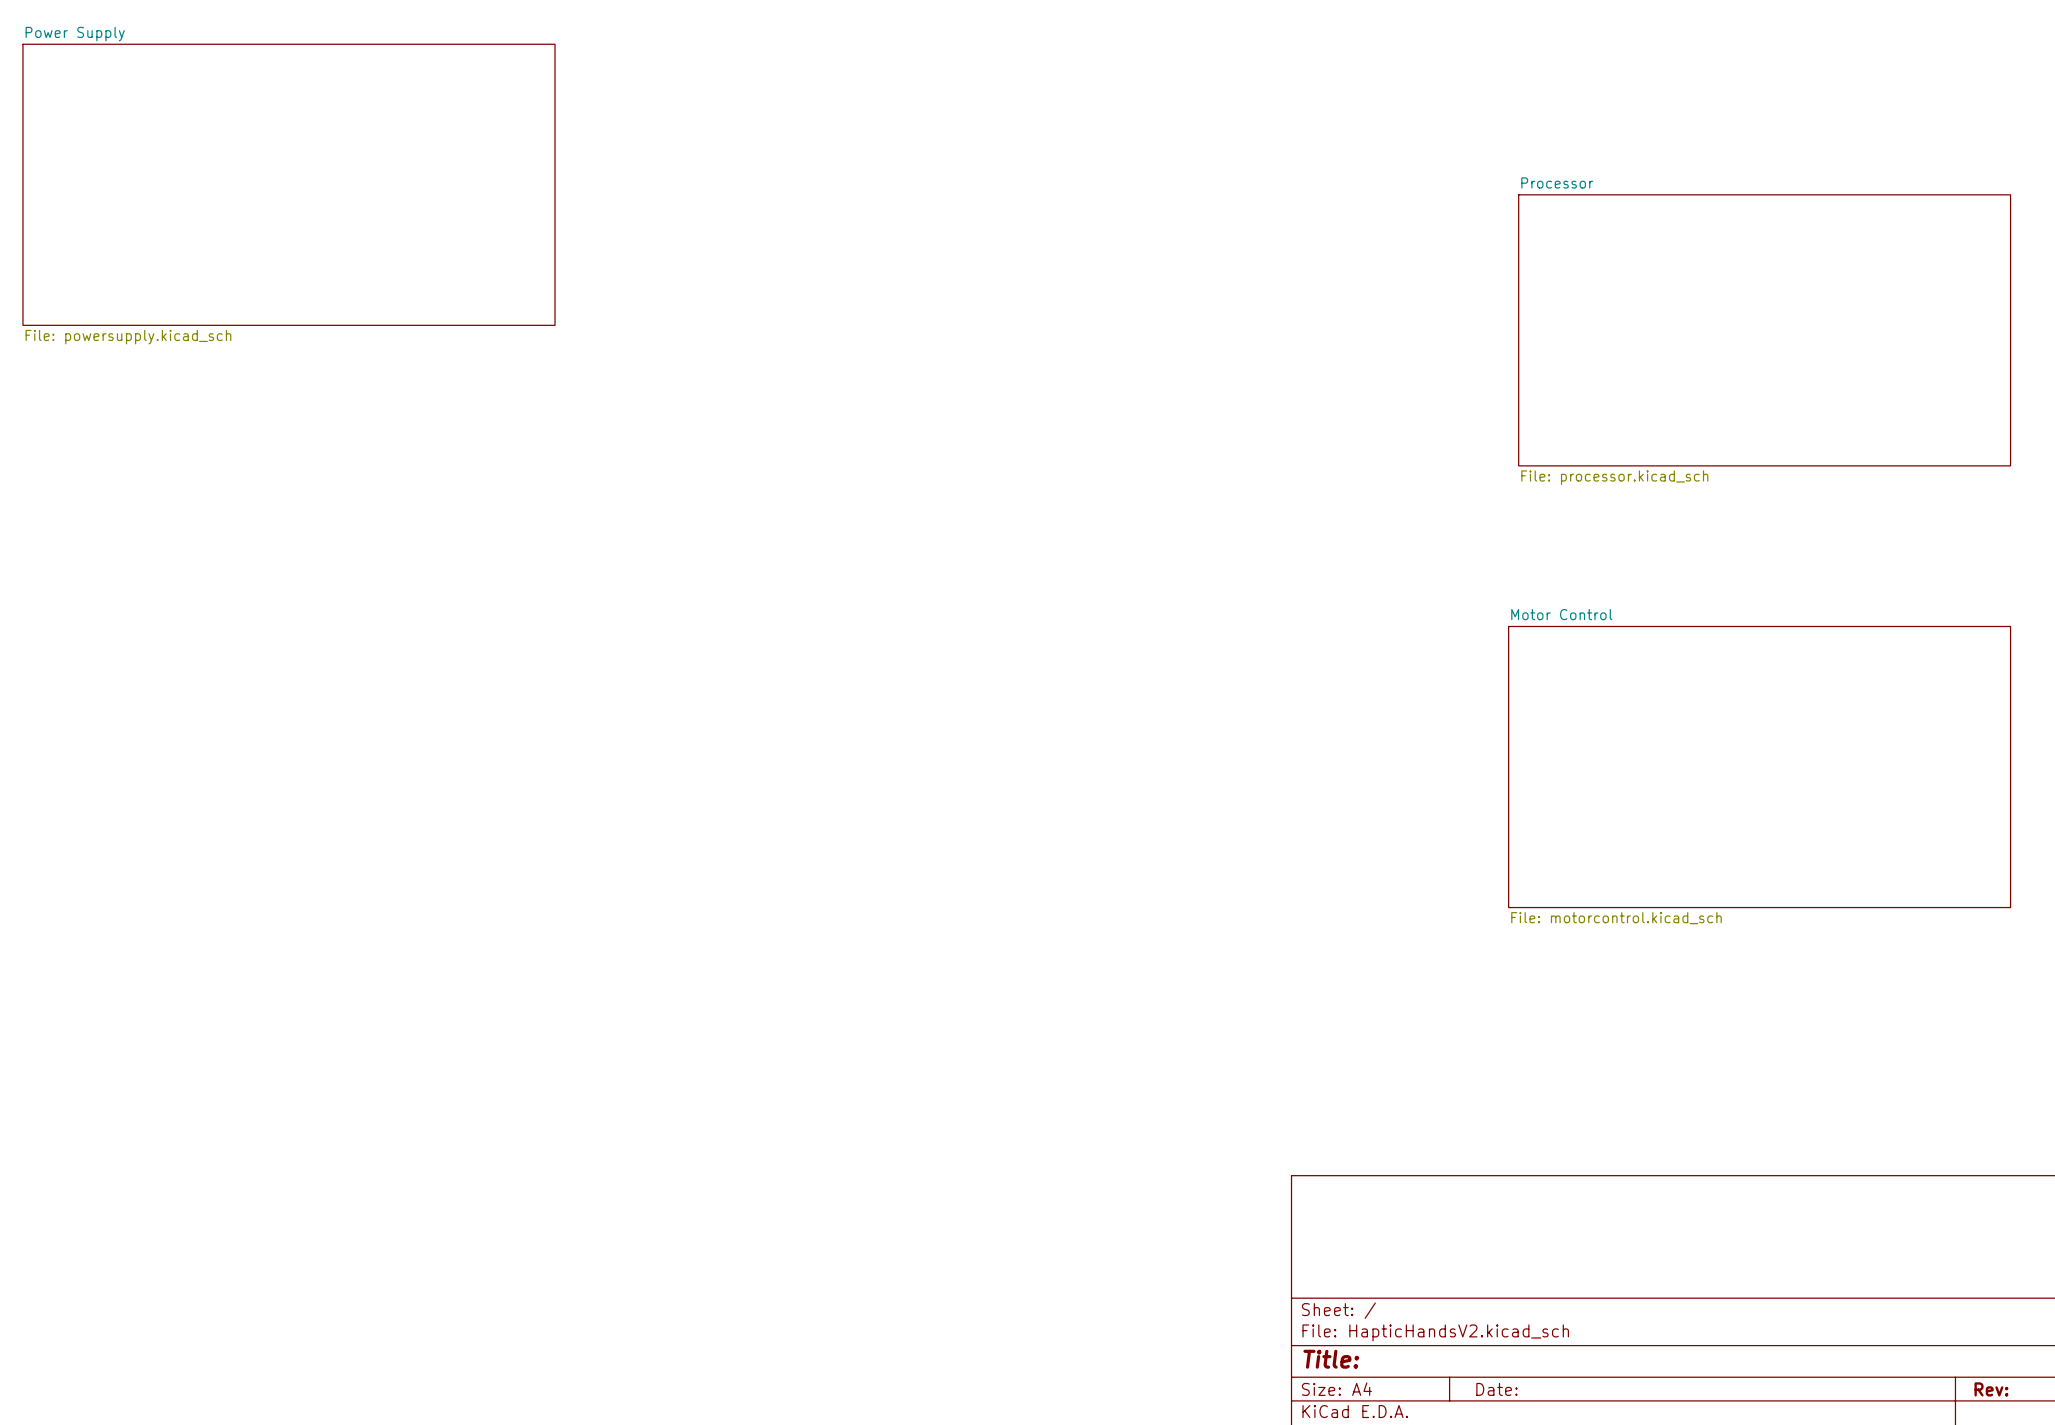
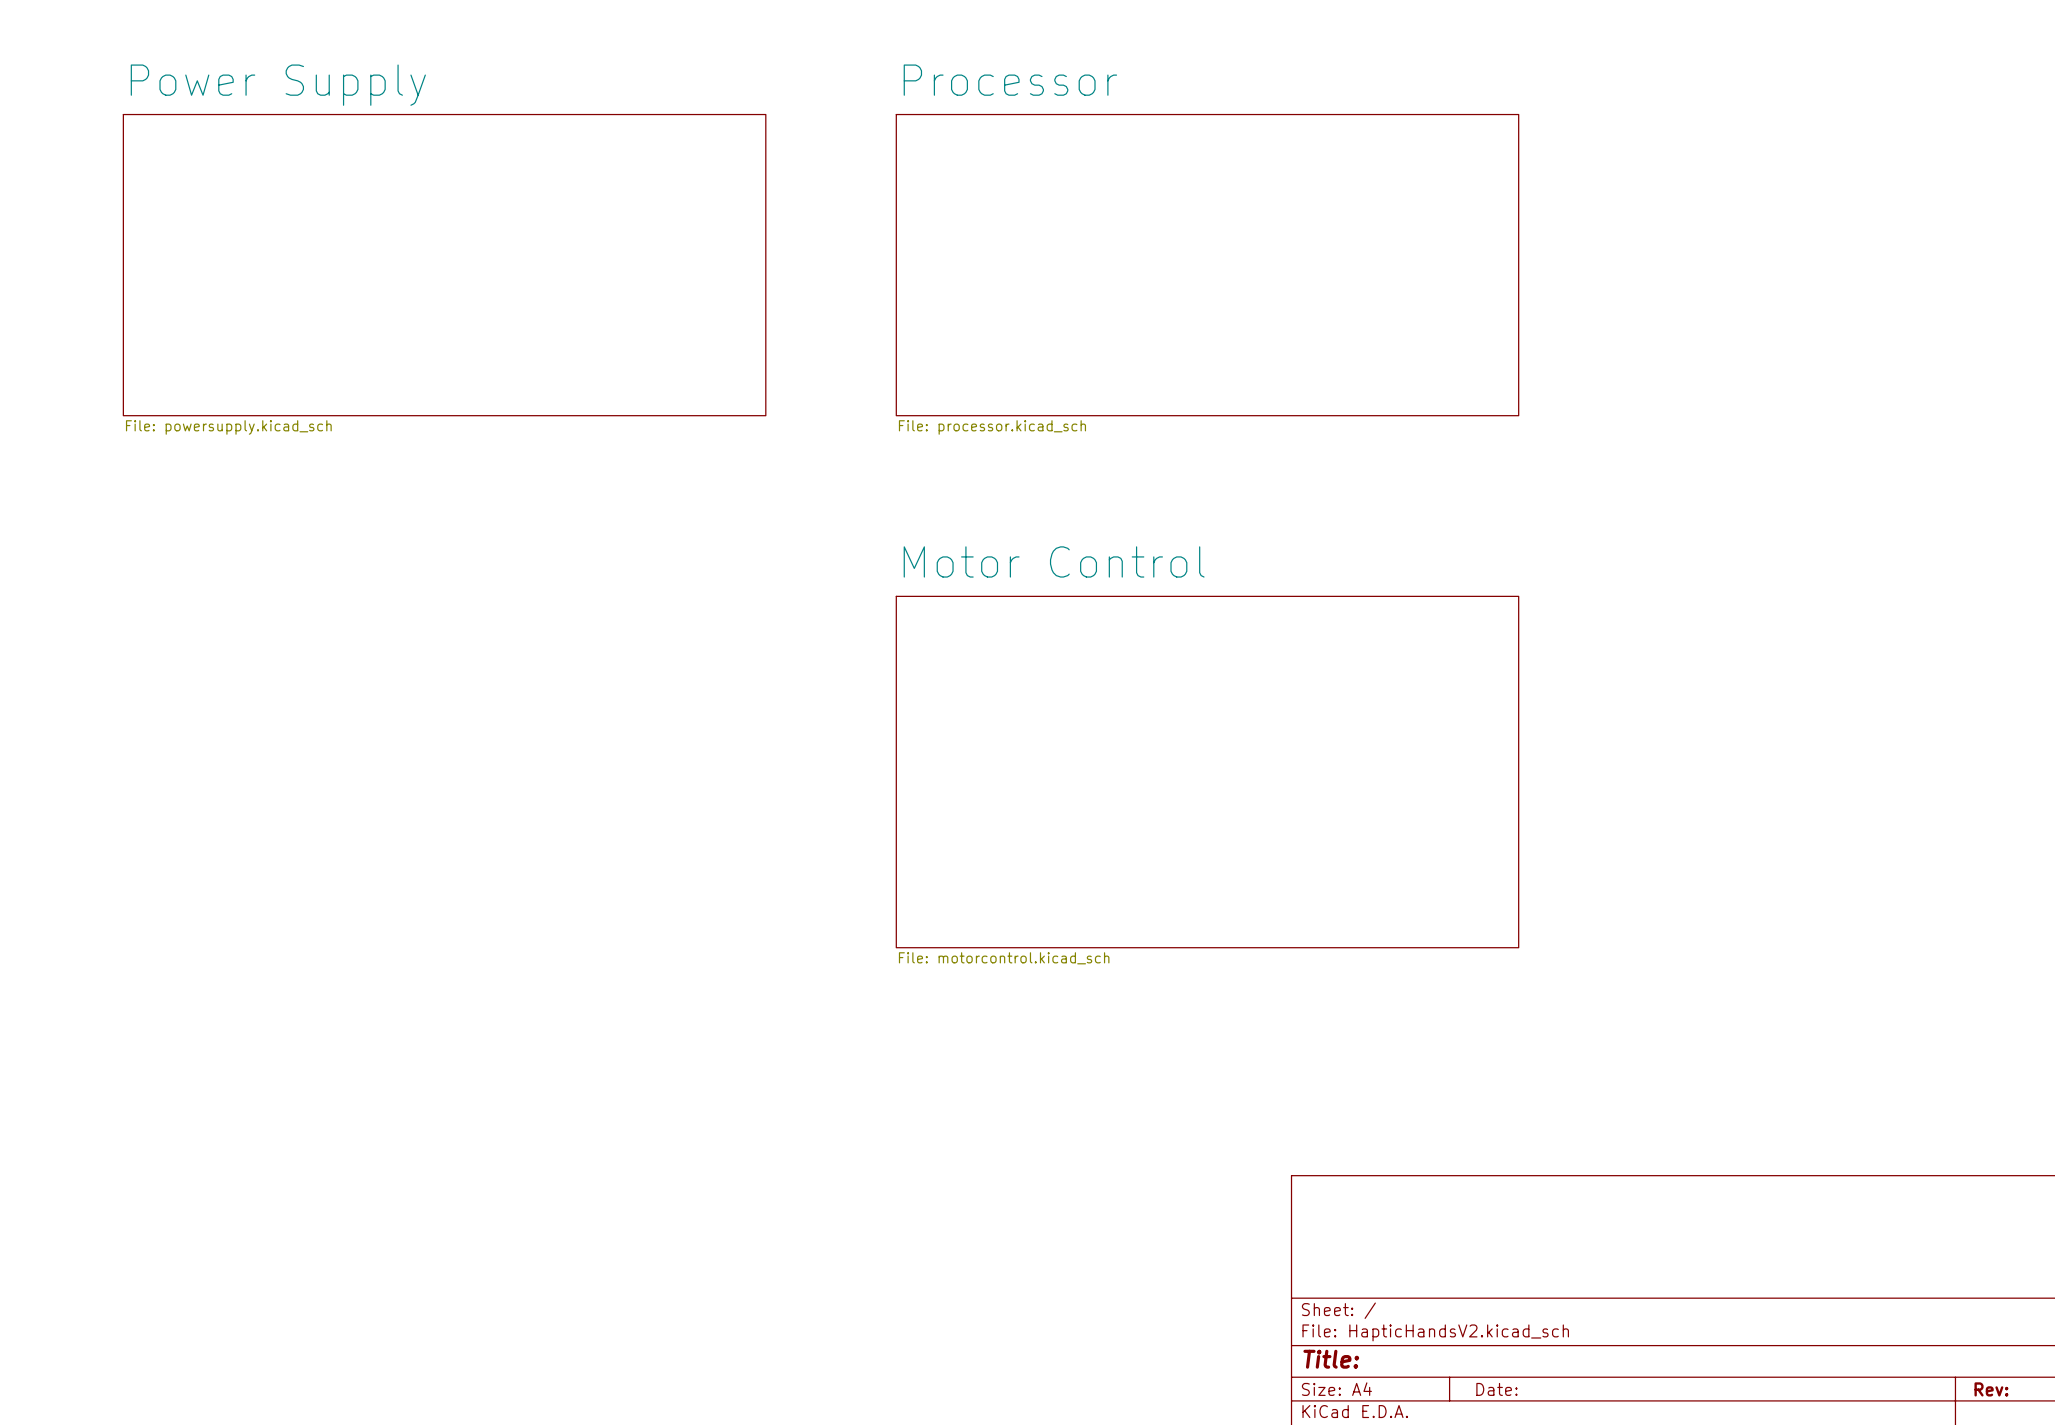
sheet Power Supply: File: powersupply.kicad_sch (288, 184) -> none
sheet Power Supply: none -> File: powersupply.kicad_sch (444, 265)
sheet Processor: none -> File: processor.kicad_sch (1207, 265)
sheet Processor: File: processor.kicad_sch (1764, 330) -> none
sheet Motor Control: File: motorcontrol.kicad_sch (1759, 767) -> none
sheet Motor Control: none -> File: motorcontrol.kicad_sch (1207, 772)

